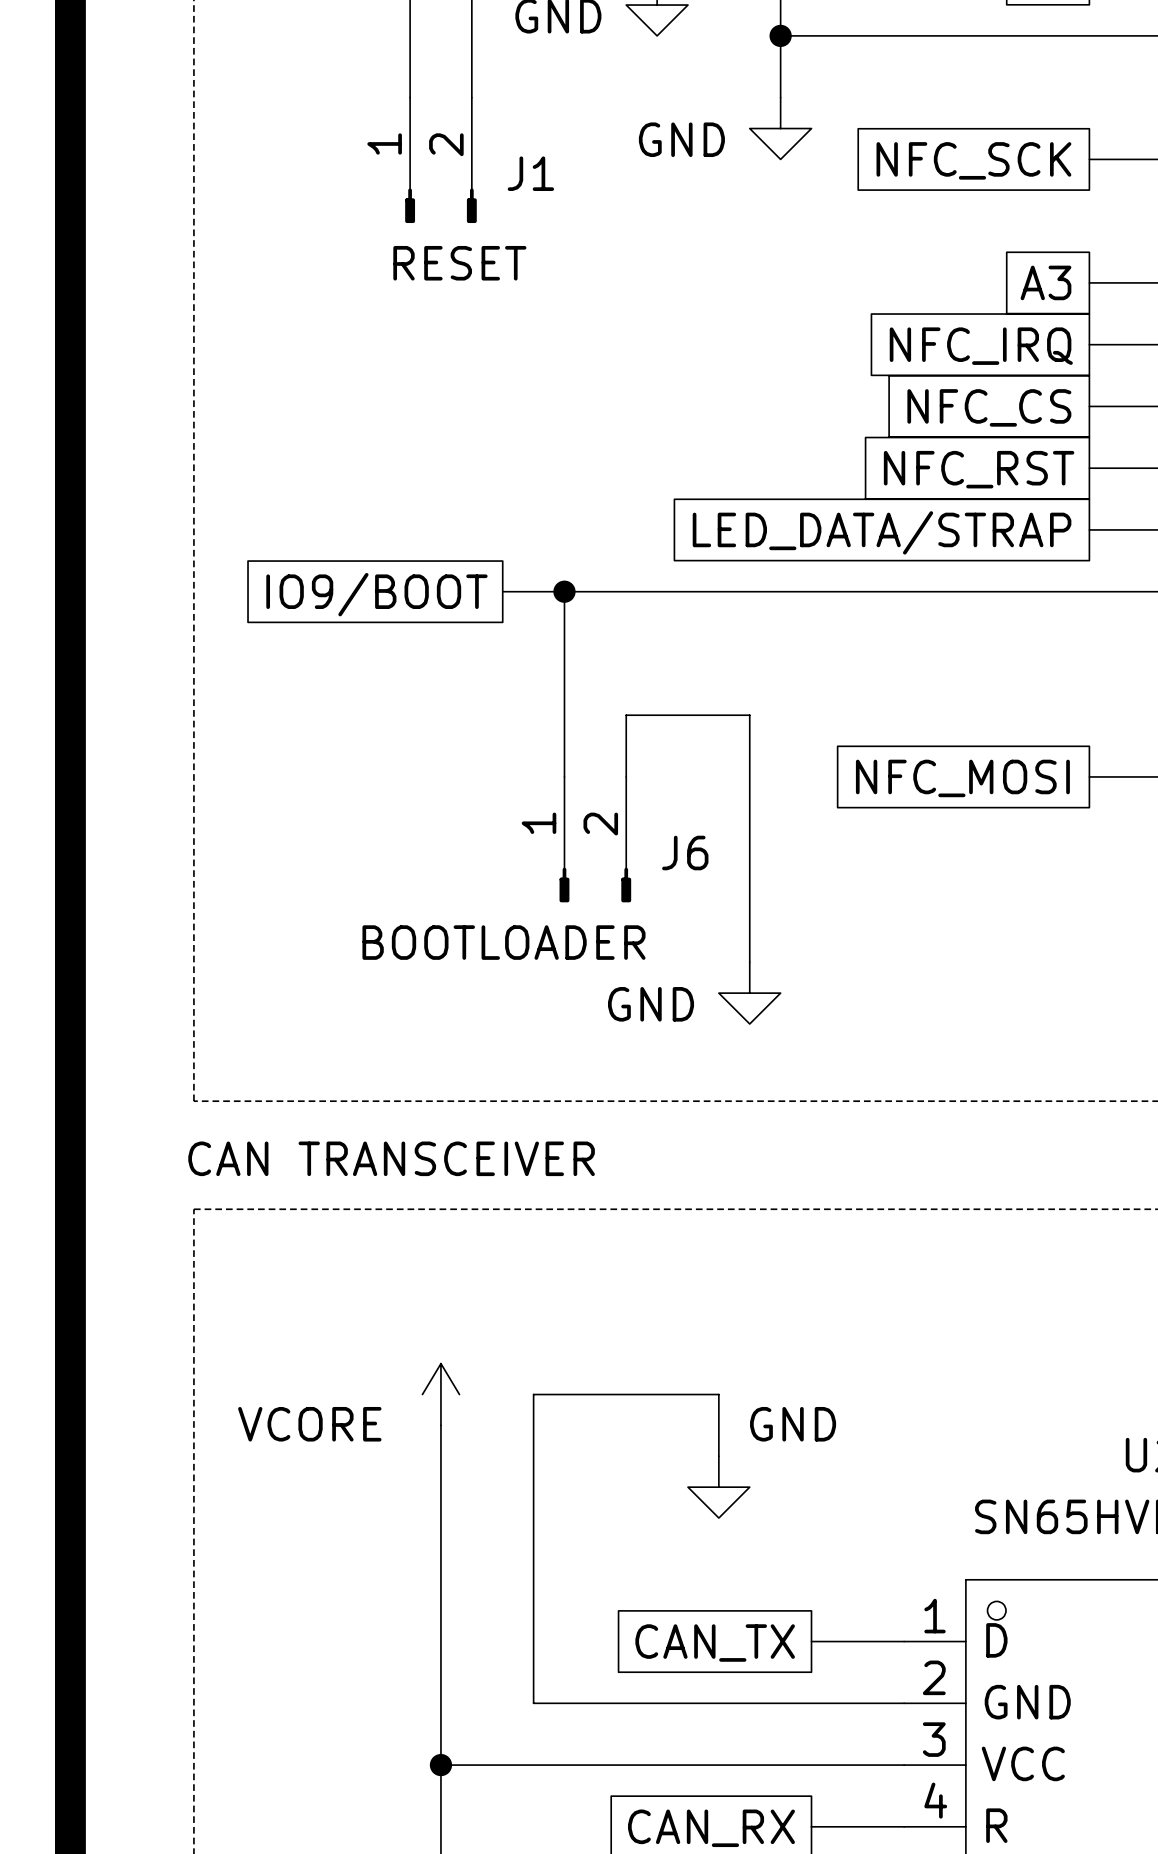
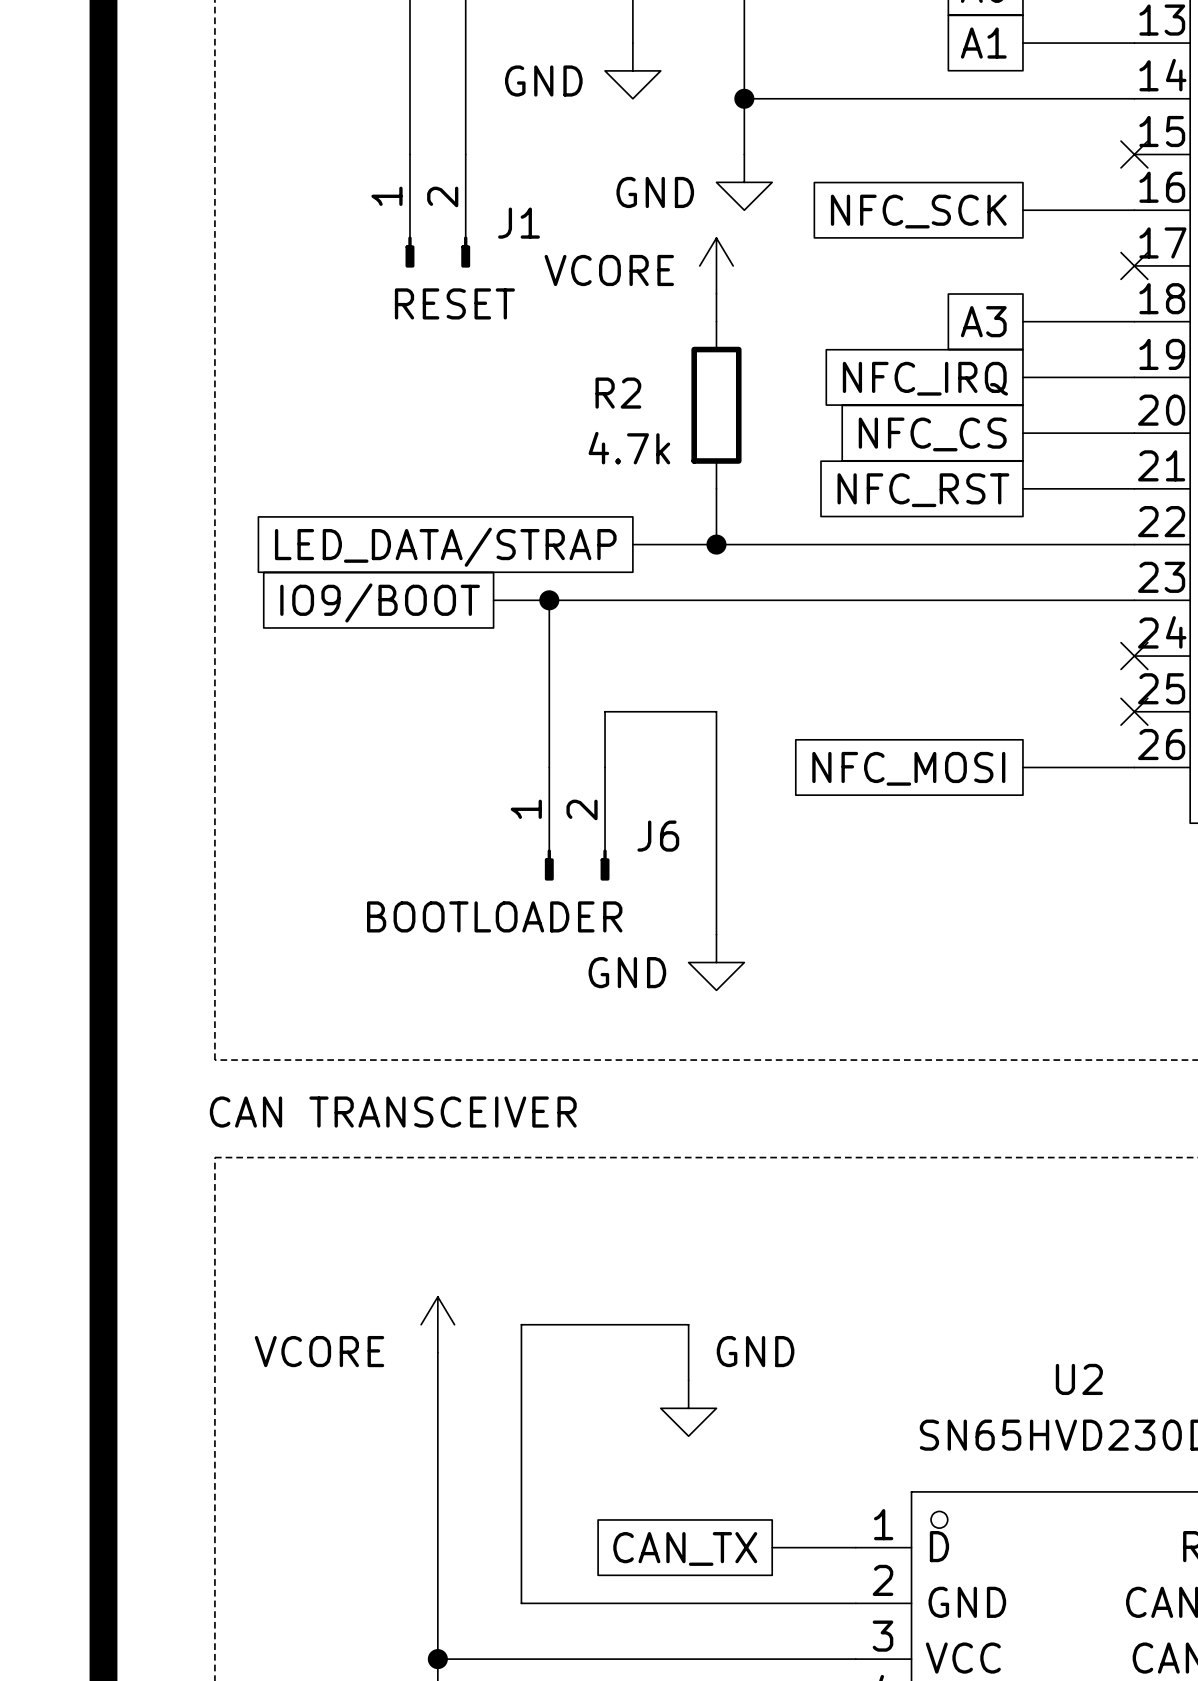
power symbol: none -> VCORE (716, 265)
wire: none -> (716, 293) (716, 321)
R2: none -> 4.7k (716, 405)
wire: none -> (716, 488) (716, 544)
wire: none -> (632, 544) (1022, 544)
junction: none -> (716, 544)
global label position: LED_DATA/STRAP (882, 532) -> LED_DATA/STRAP (445, 547)

